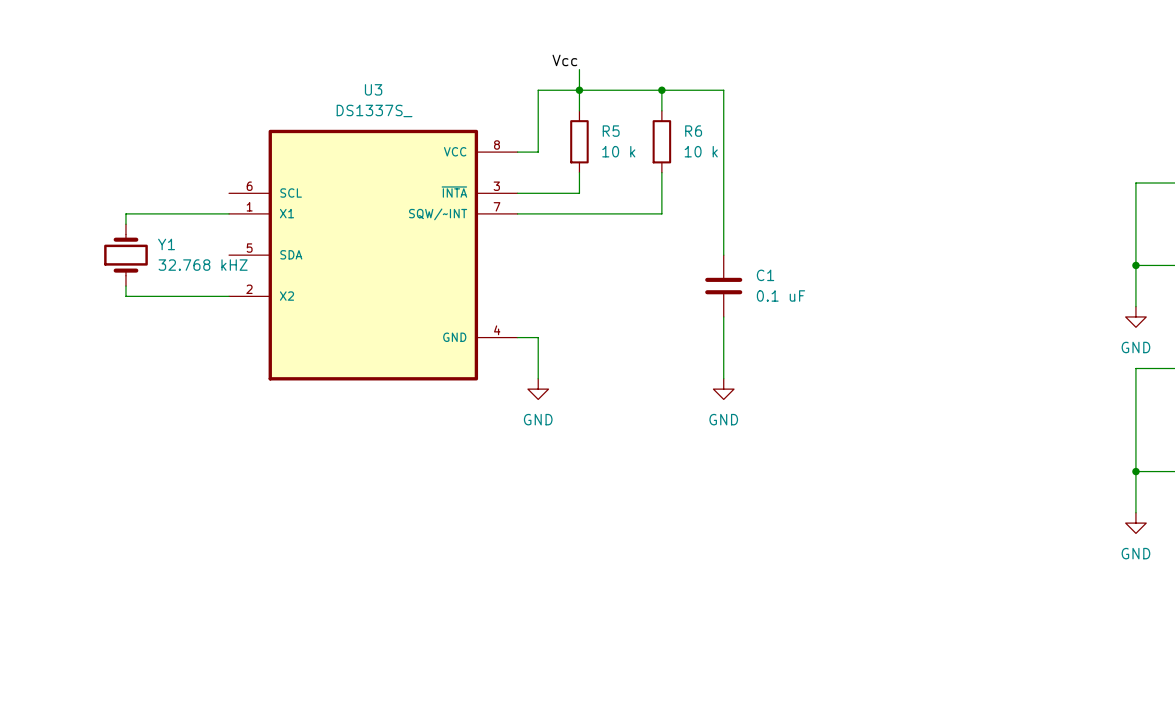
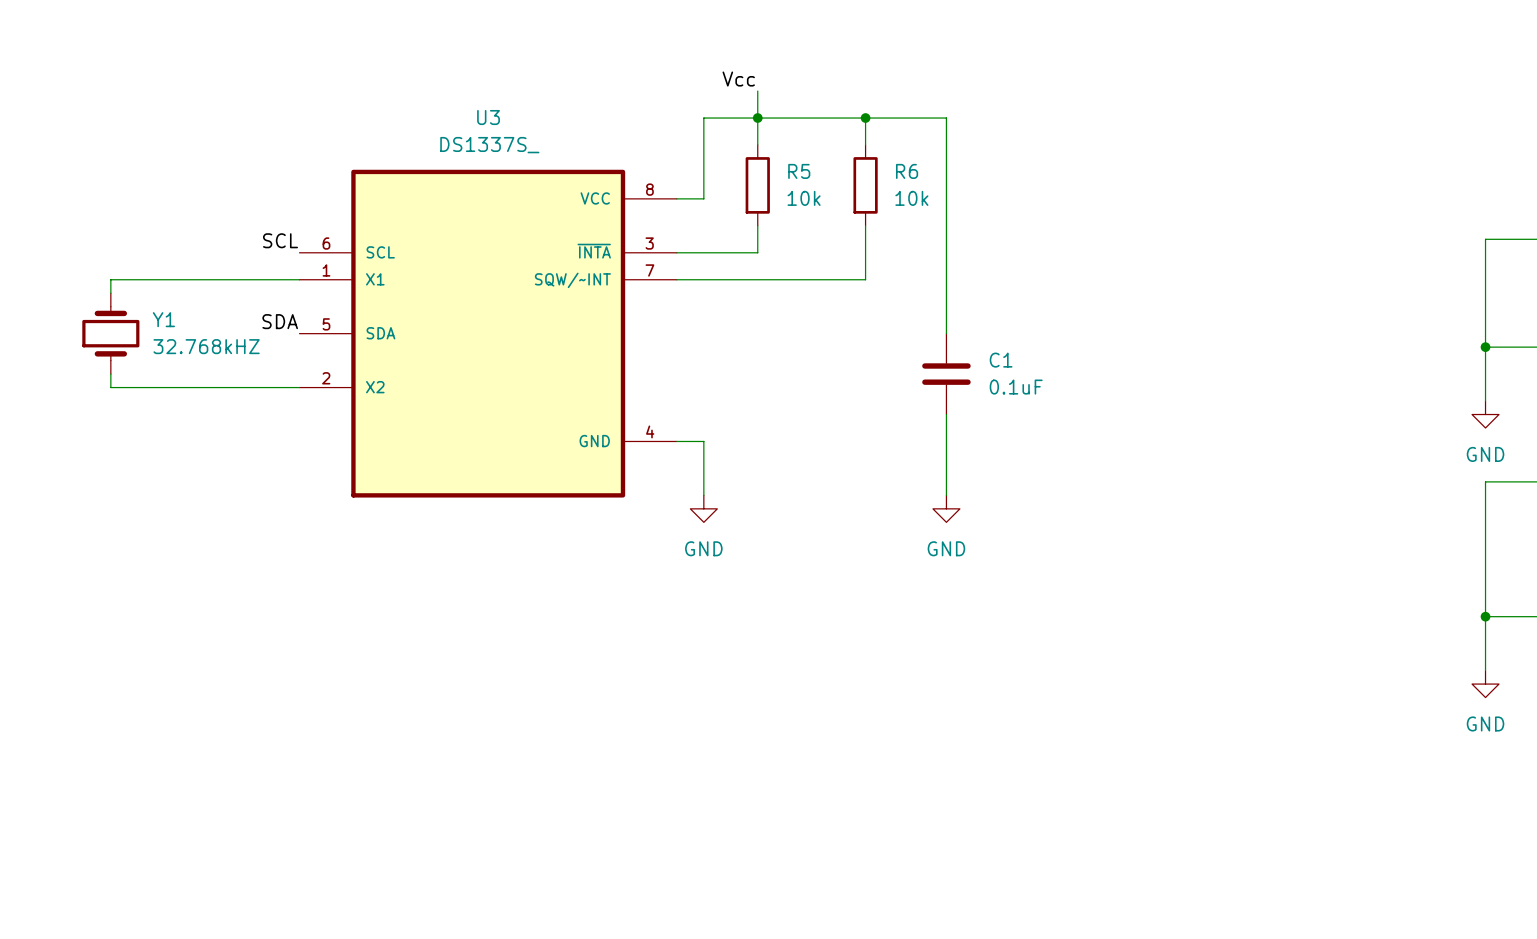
R5 value: 10 k (618, 151) -> 10k (804, 198)
R6 value: 10 k (701, 151) -> 10k (911, 198)
label: none -> SCL (280, 240)
wire: (125, 213) (125, 224) -> (164, 279) (110, 279) (110, 293)
label: none -> SDA (280, 321)
Y1 position: (125, 255) -> (110, 333)
Y1 value: 32.768 kHZ (203, 265) -> 32.768kHZ (206, 346)
wire: (125, 286) (125, 296) -> (110, 374) (110, 387) (164, 387)
C1 value: 0.1 uF (780, 295) -> 0.1uF (1016, 387)

